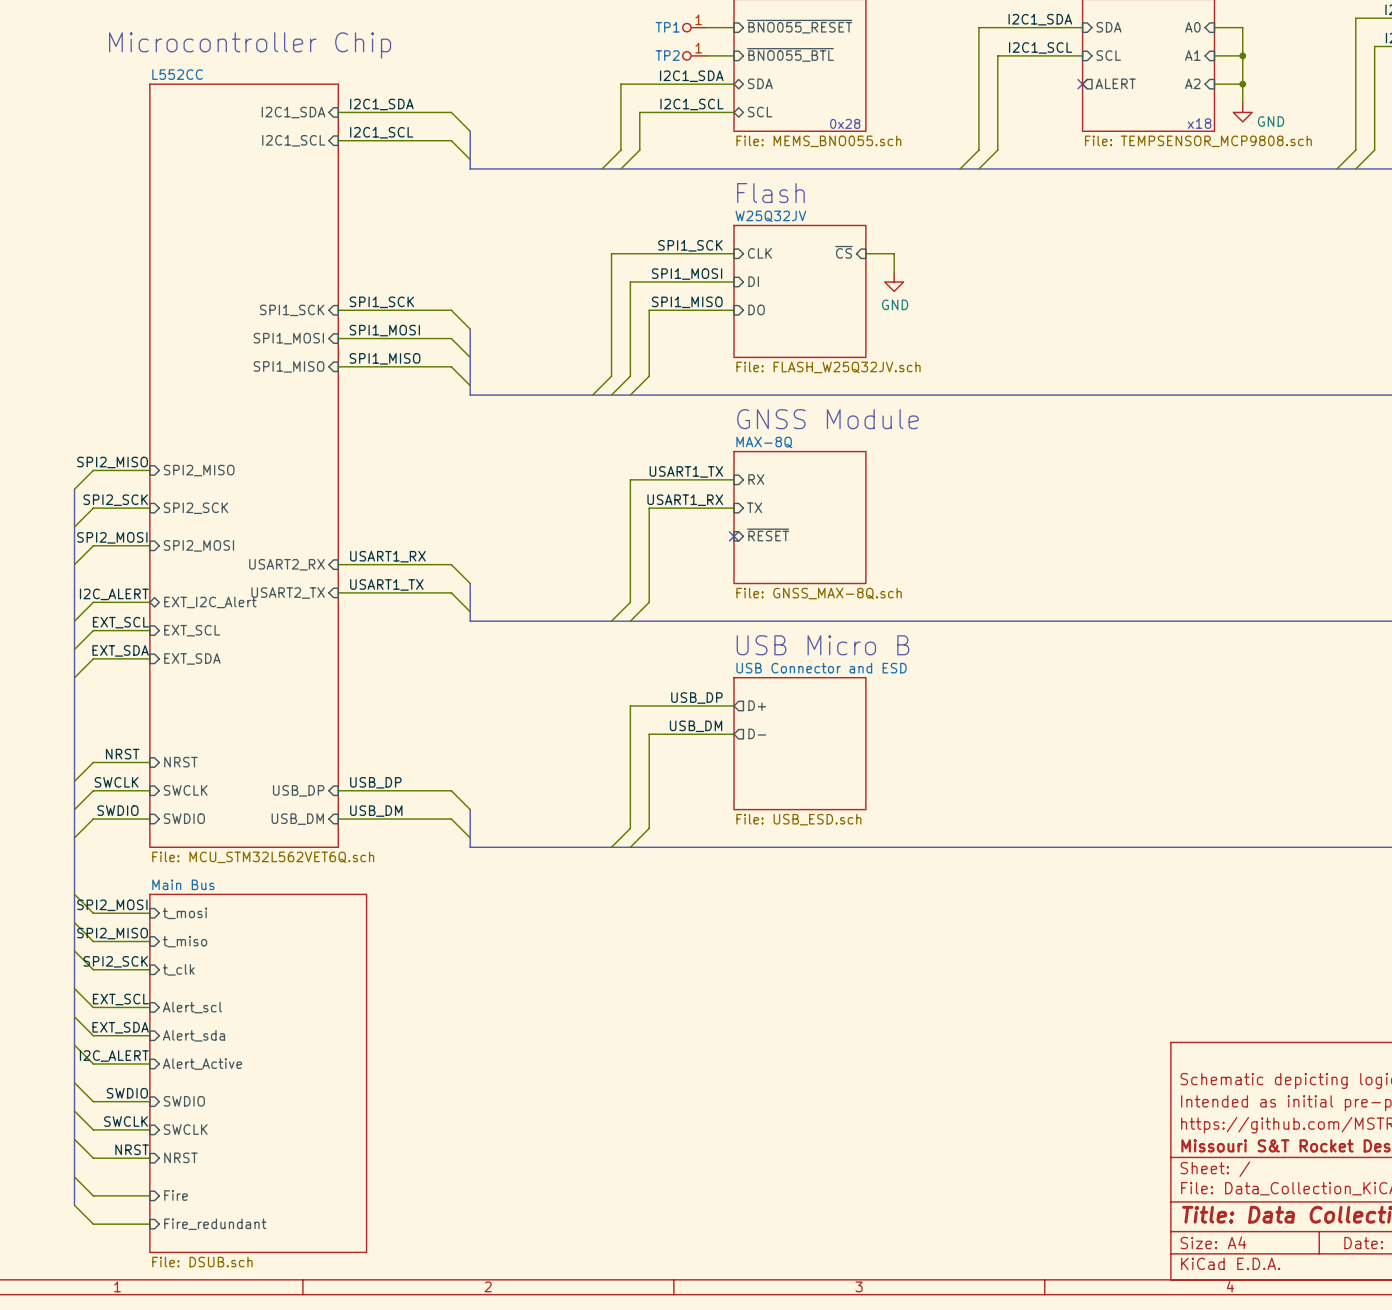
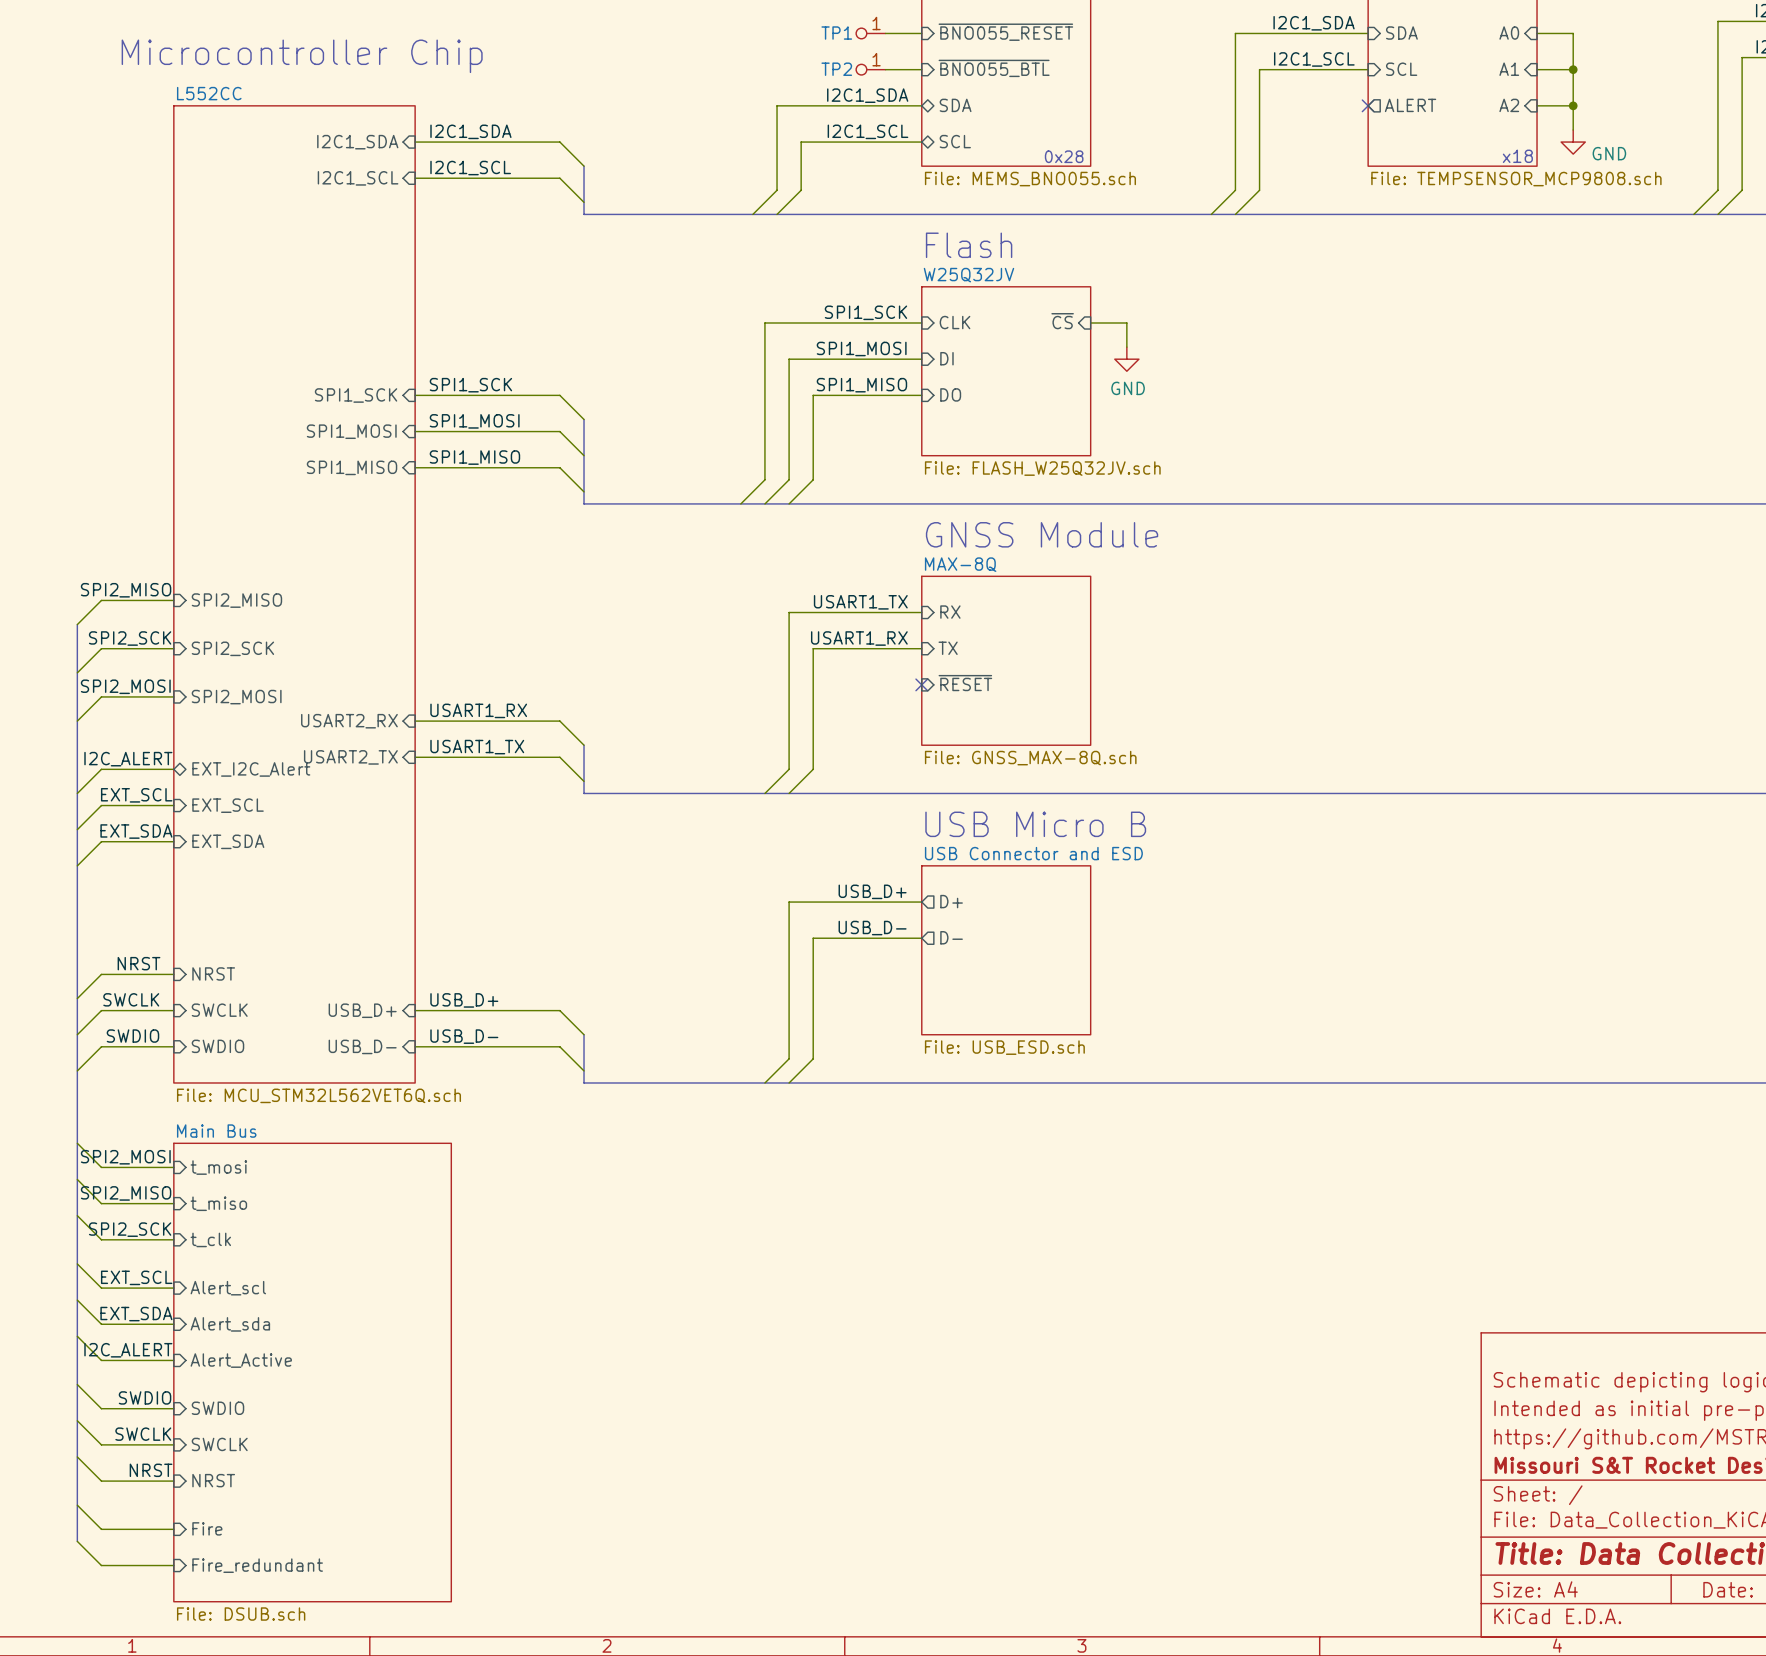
label: USB_DP (696, 698) -> USB_D+ (872, 891)
label: USB_DM (696, 726) -> USB_D- (872, 928)
label: USB_DP (375, 782) -> USB_D+ (464, 1000)
sheet pin: USB_DP (298, 790) -> USB_D+ (362, 1010)
label: USB_DM (376, 811) -> USB_D- (464, 1036)
sheet pin: USB_DM (297, 819) -> USB_D- (362, 1046)

